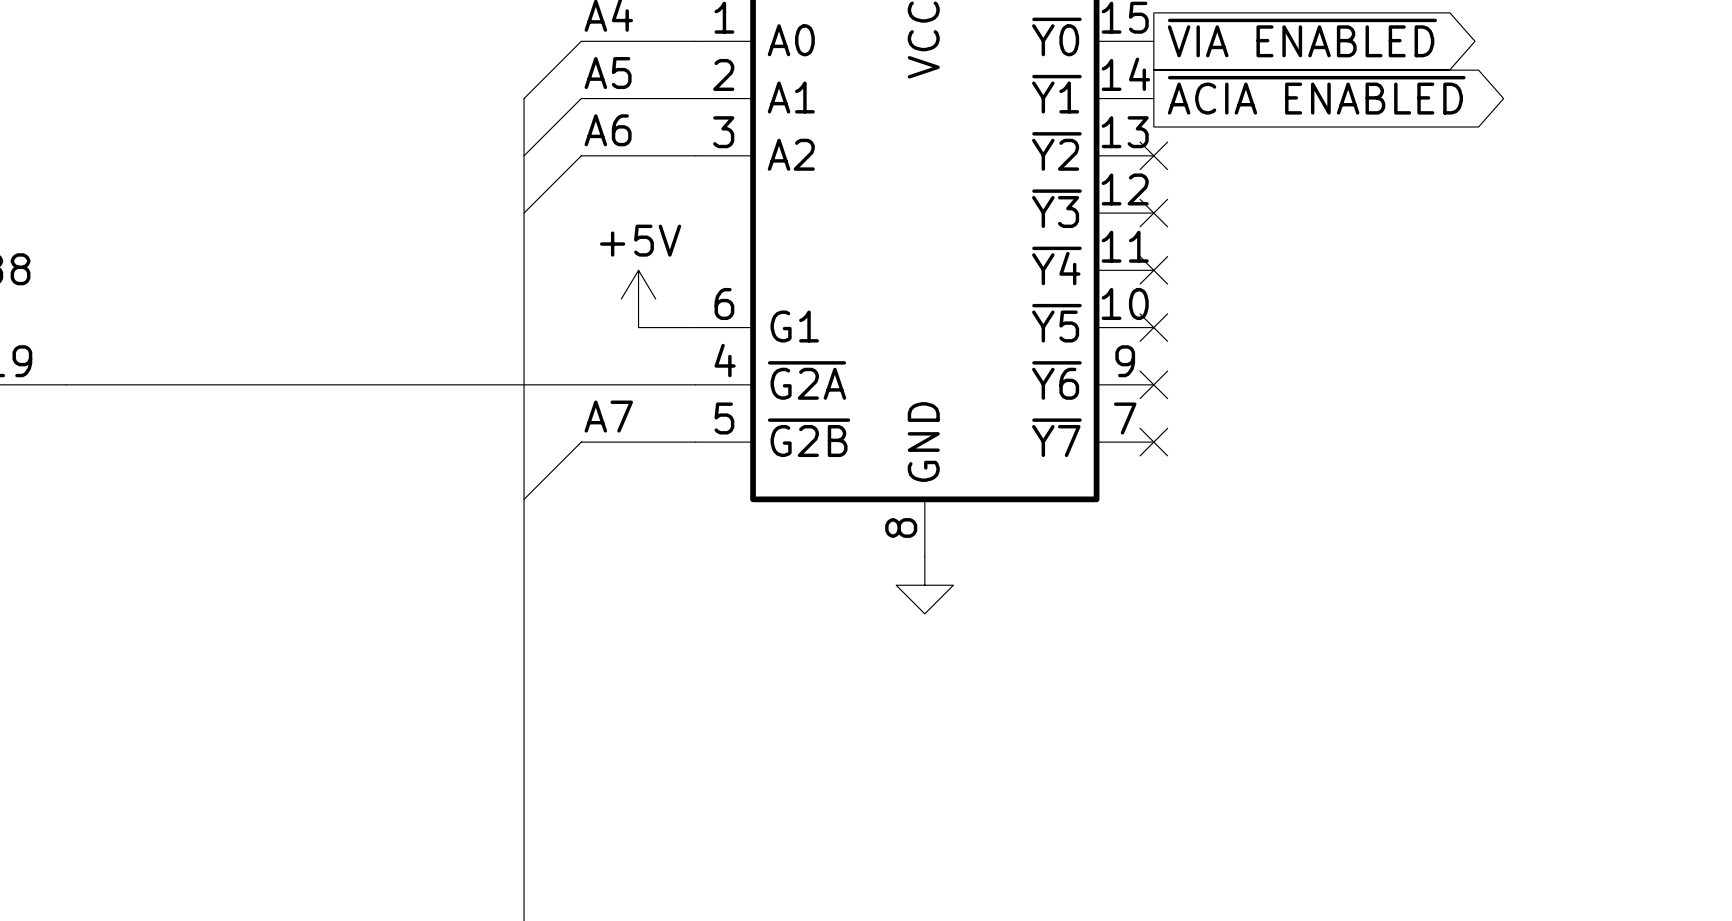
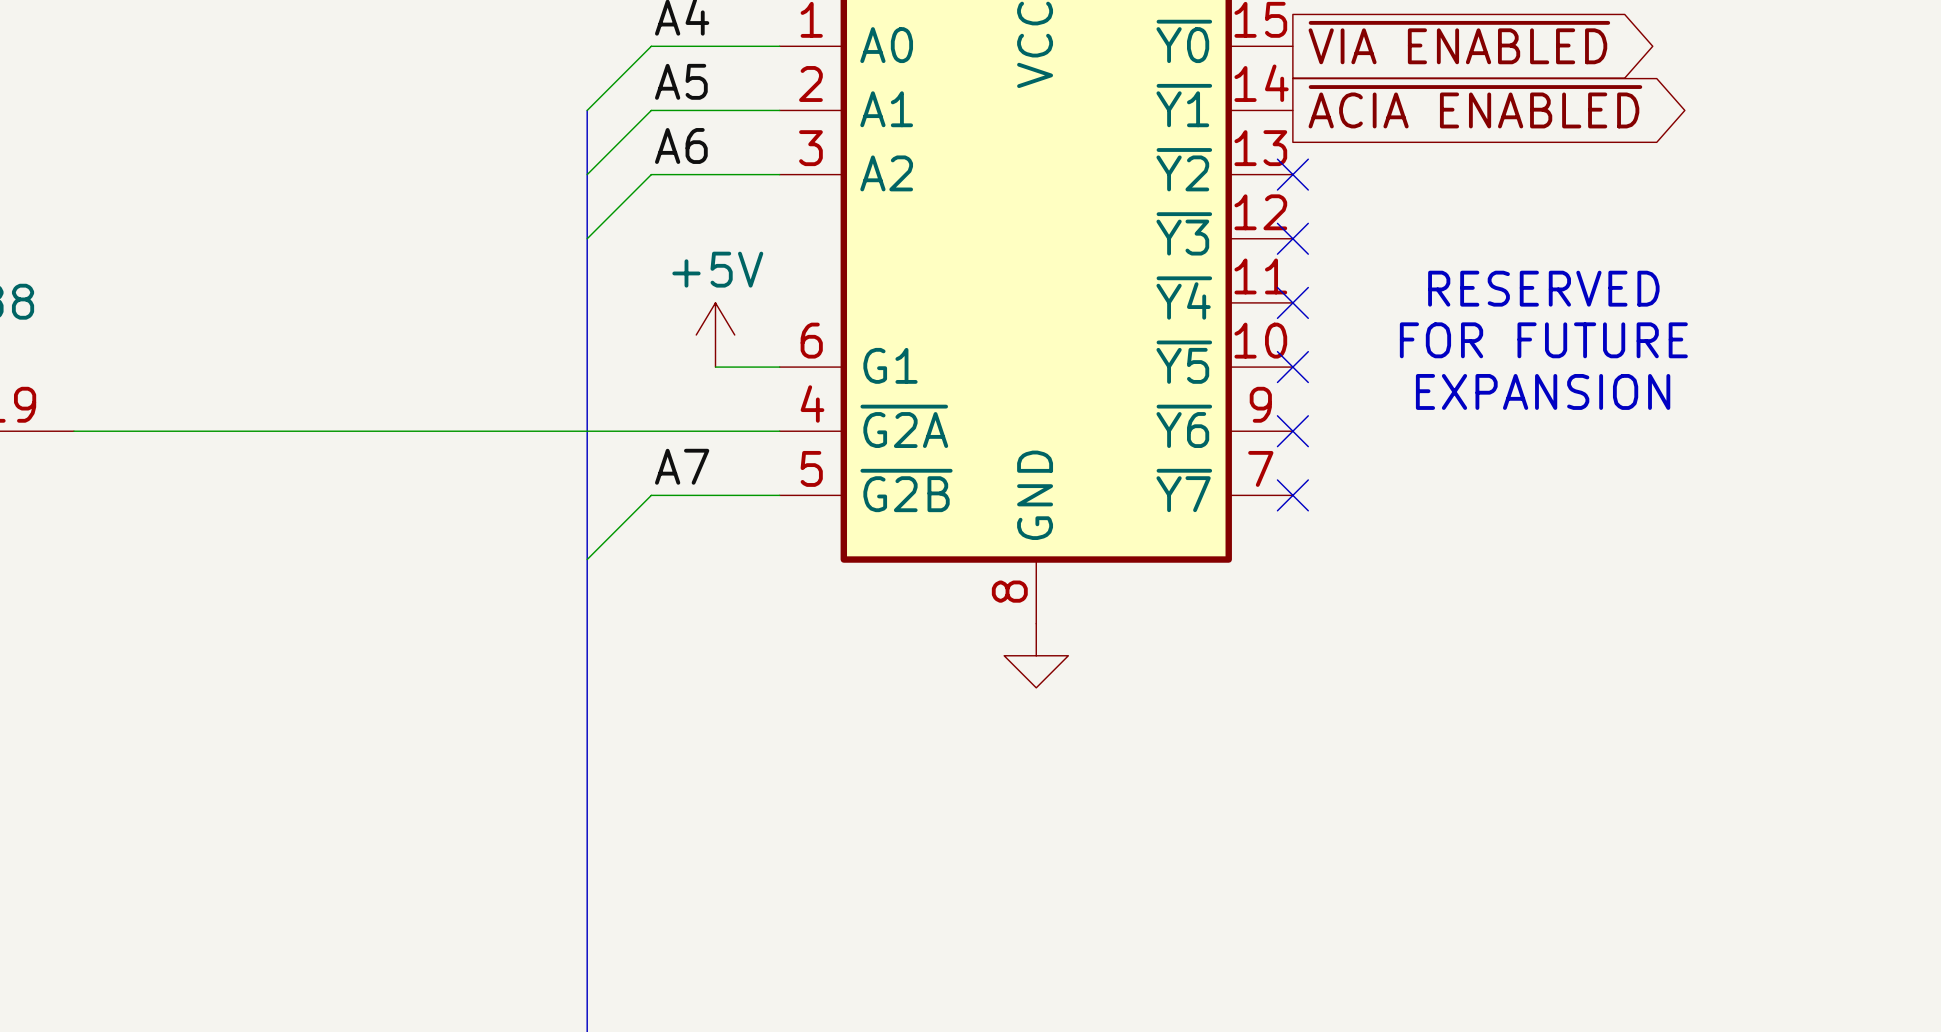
text: none -> RESERVED (1543, 288)
text: none -> FOR FUTURE (1543, 340)
text: none -> EXPANSION (1543, 391)

